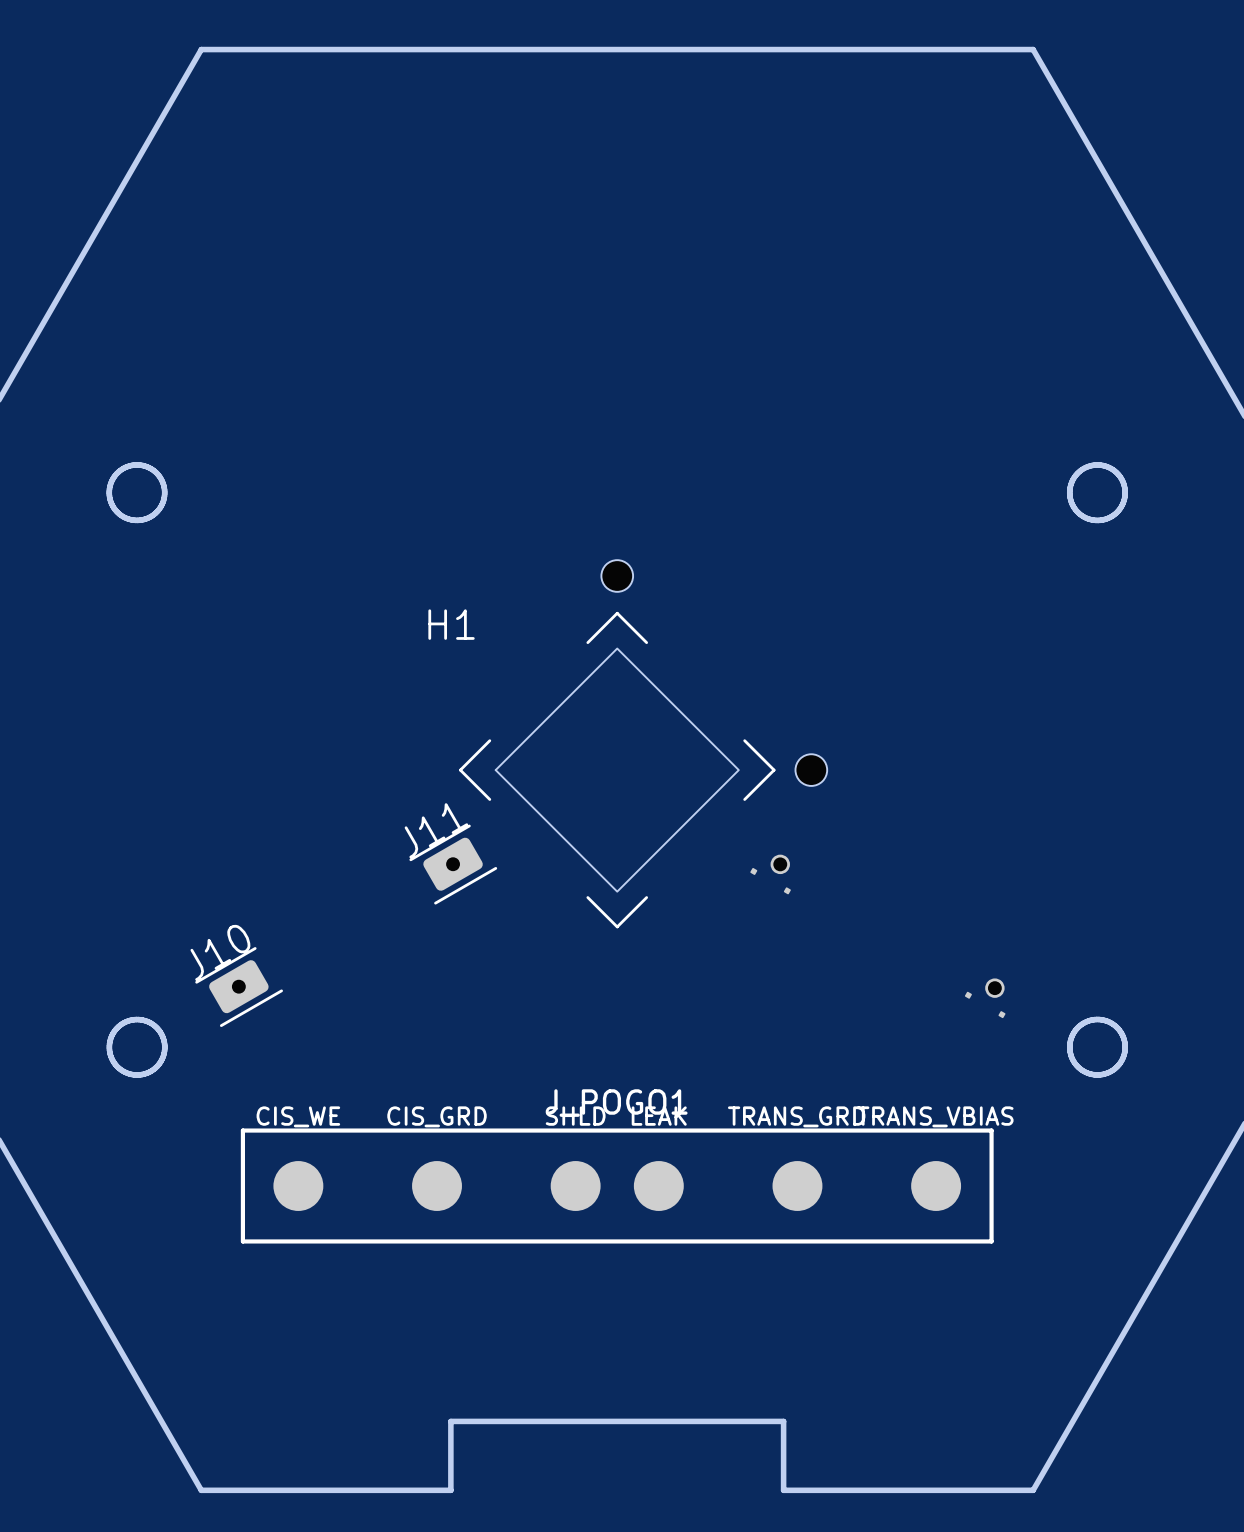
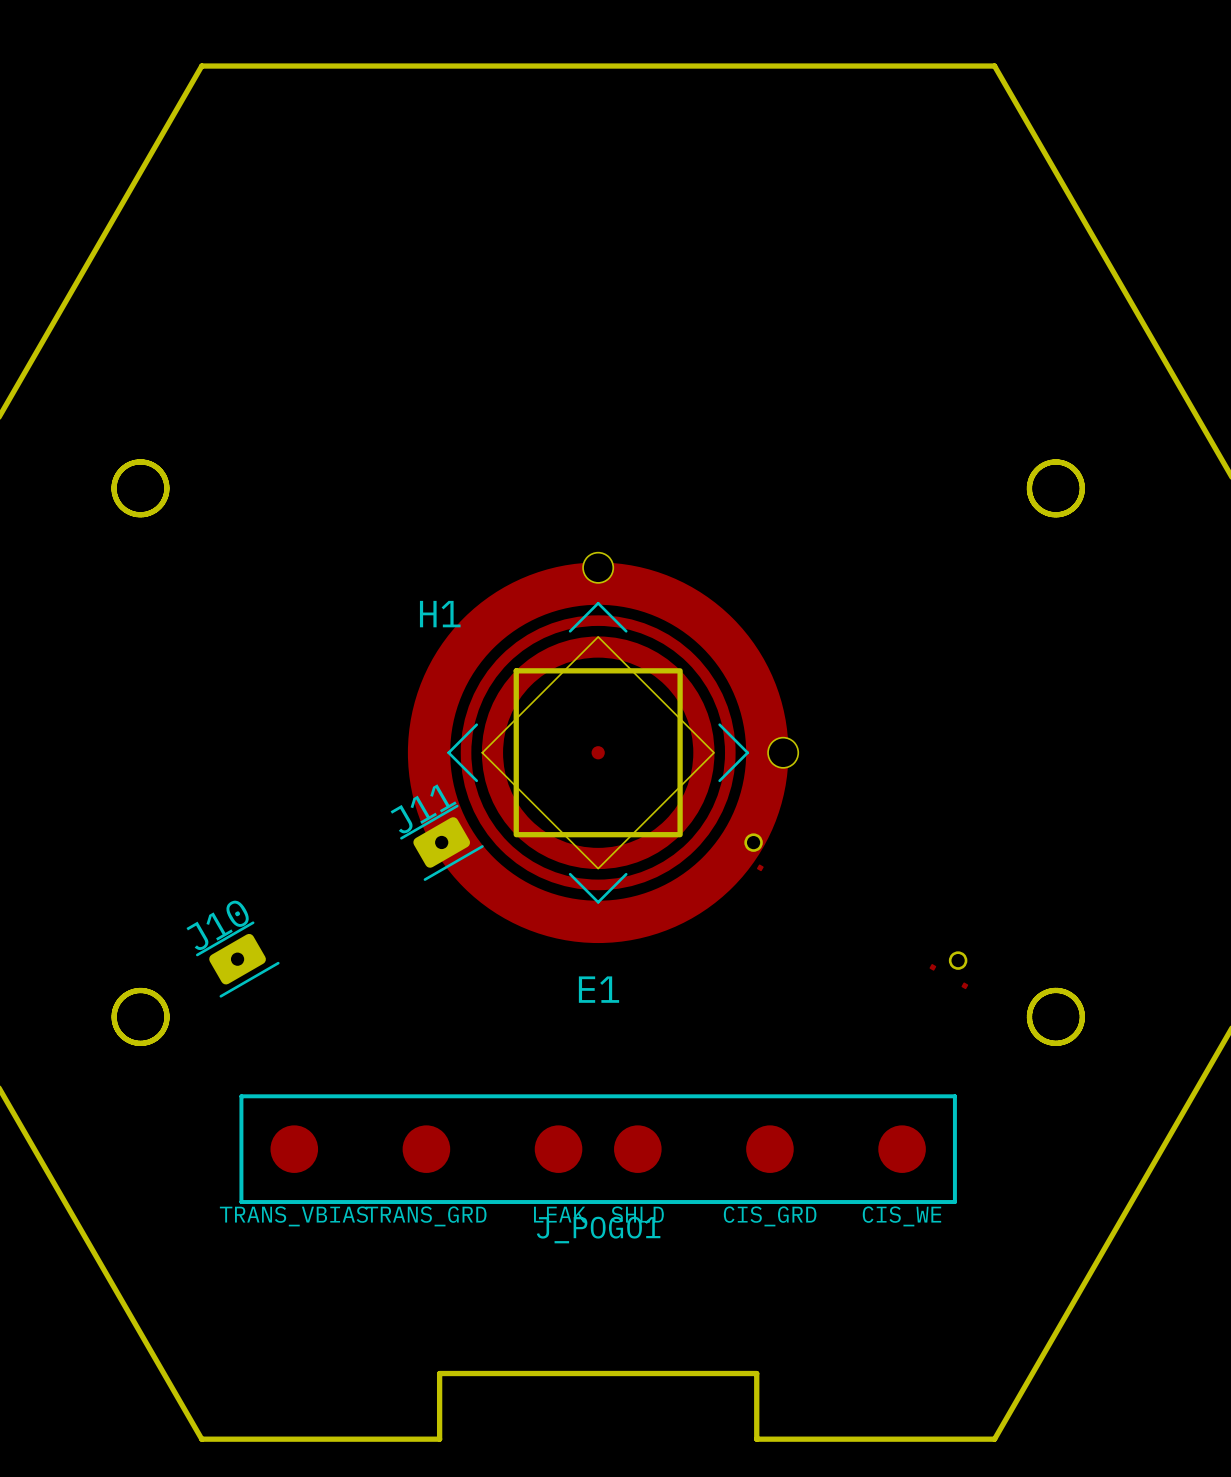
E1: none -> (598, 752)
J_POGO1 rotation: 0° (617, 1186) -> 180° (598, 1149)

